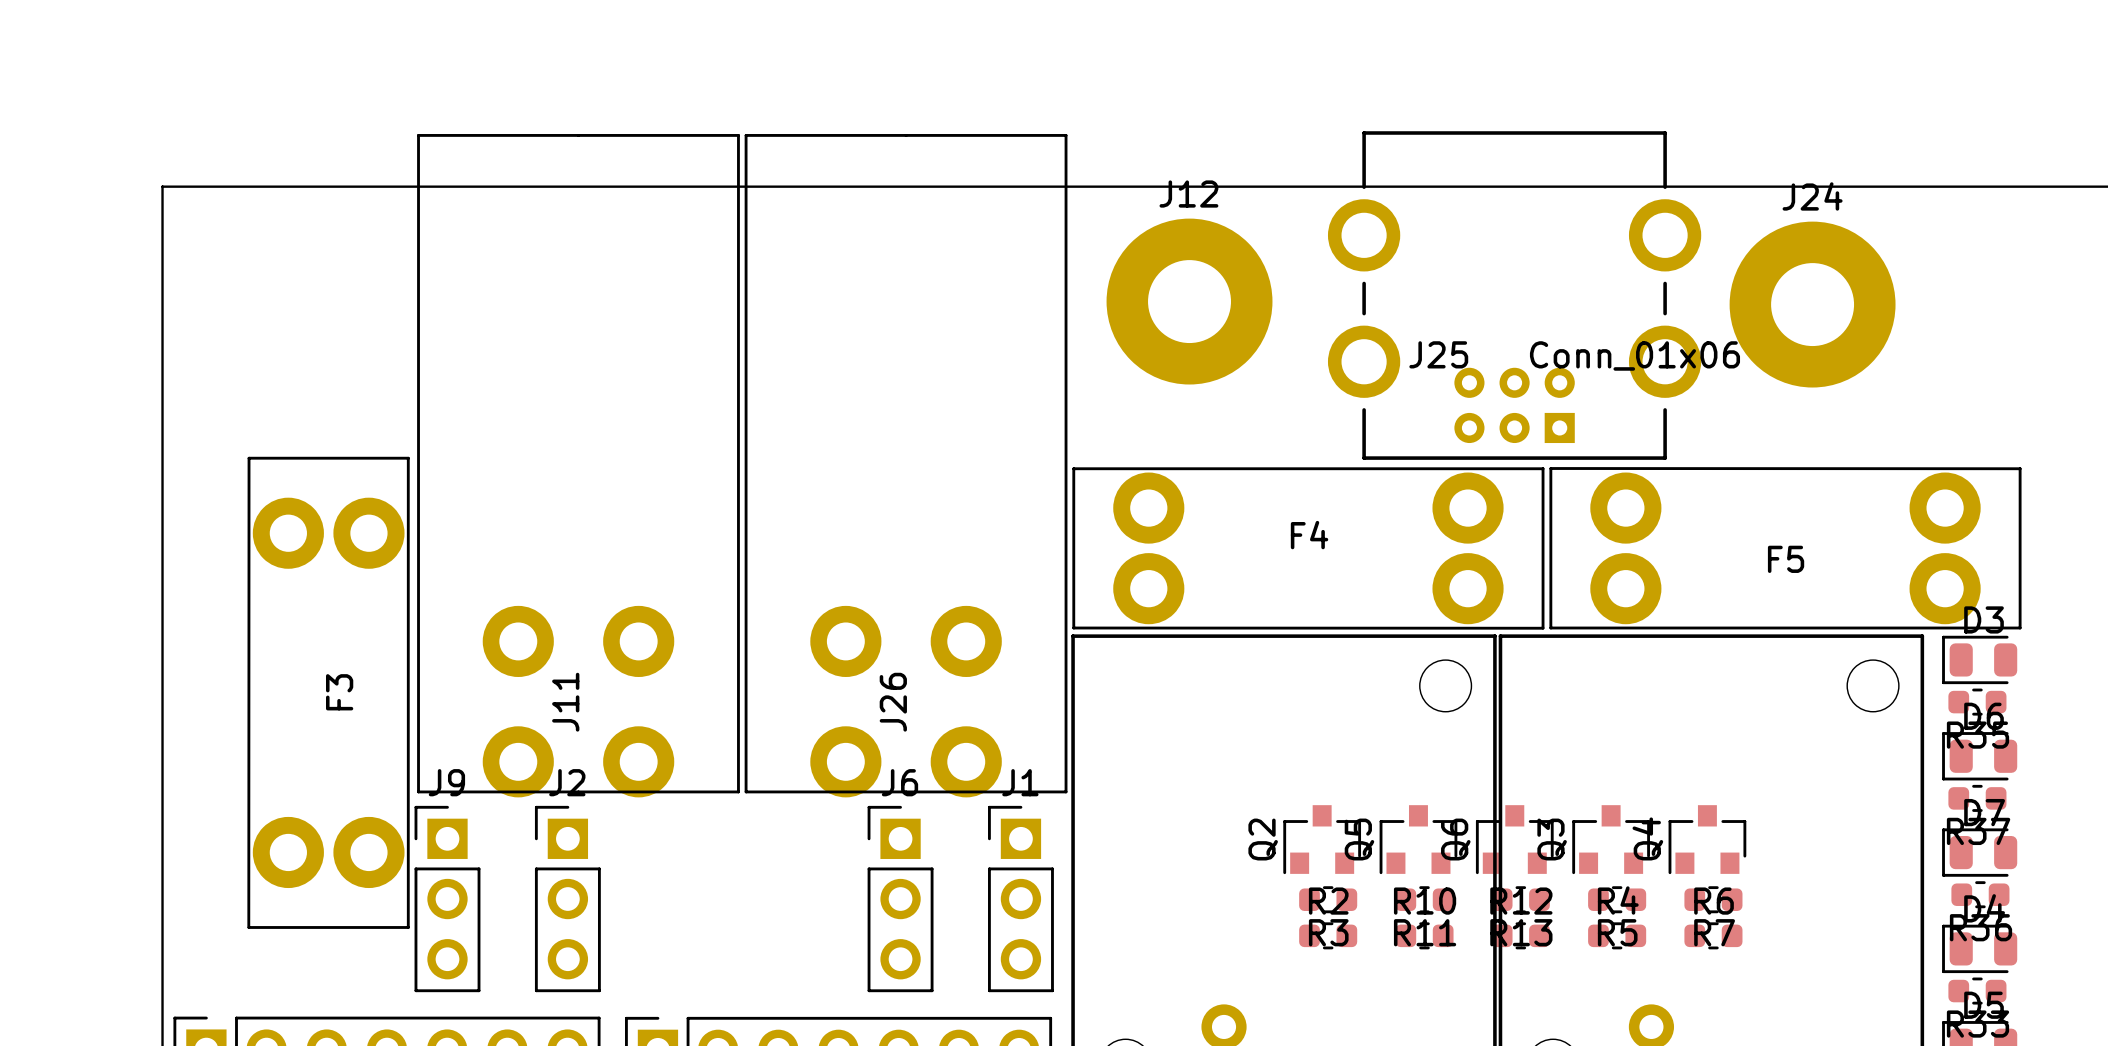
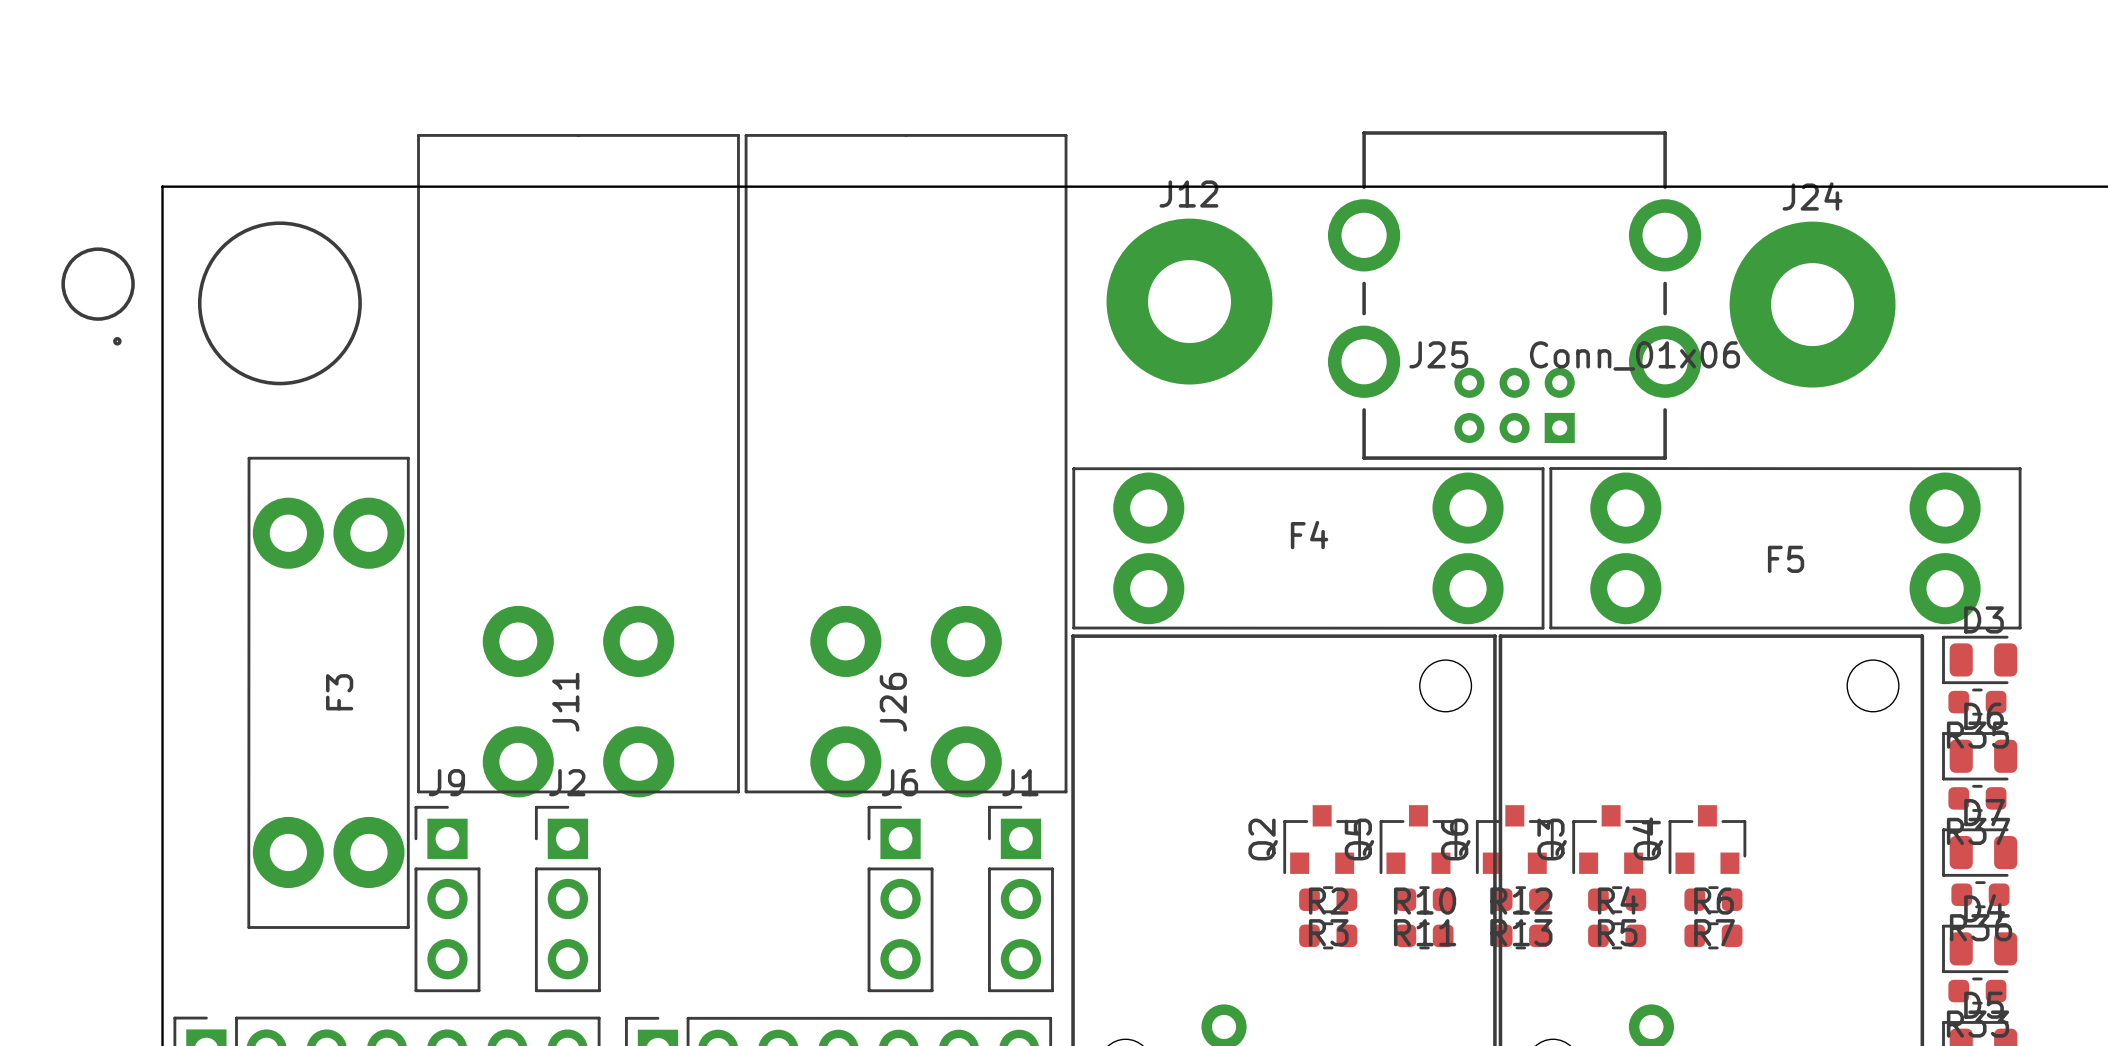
drawing: none -> [197, 221, 362, 386]
drawing: none -> [61, 247, 135, 346]

